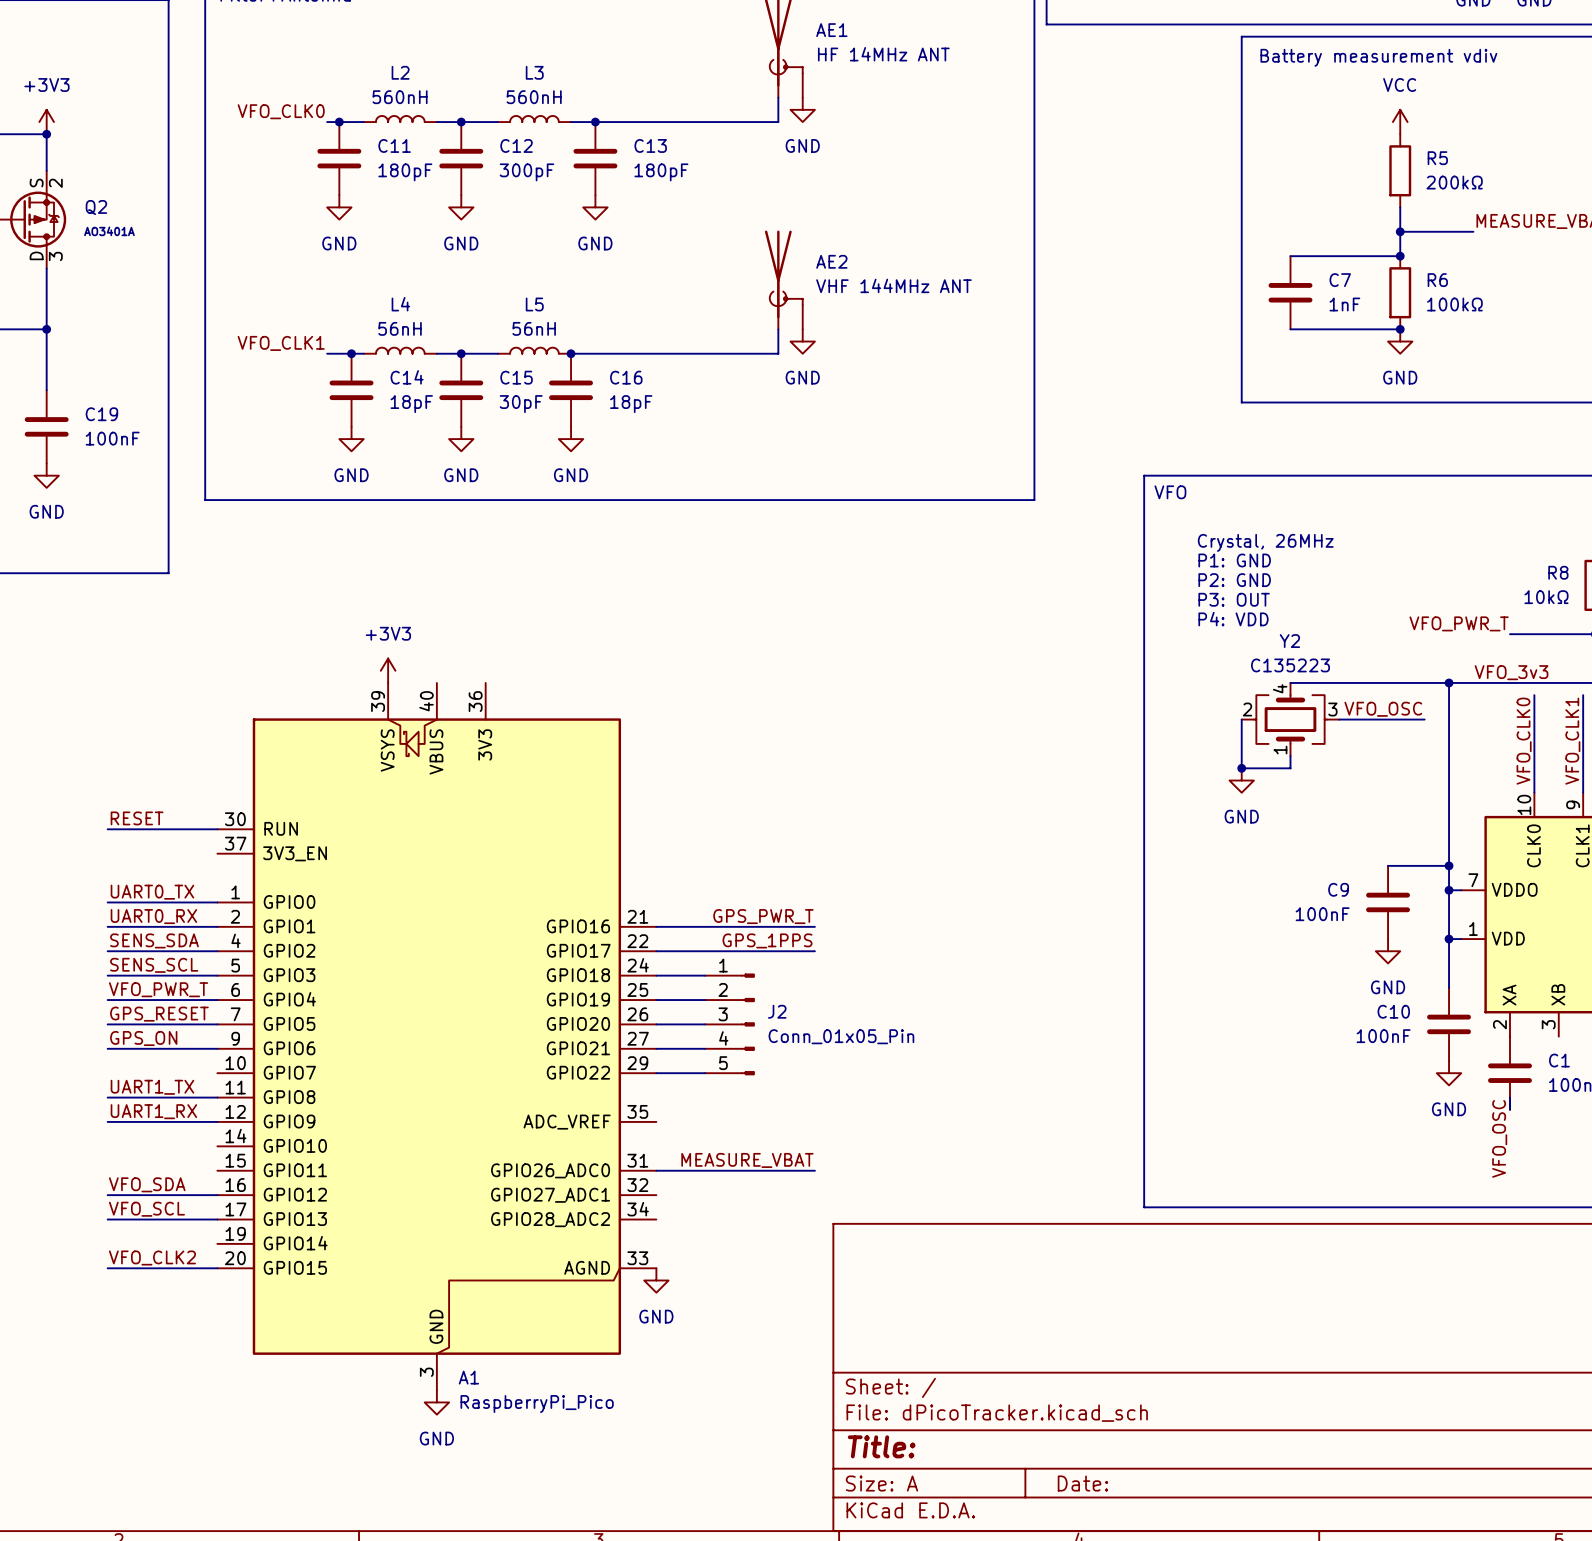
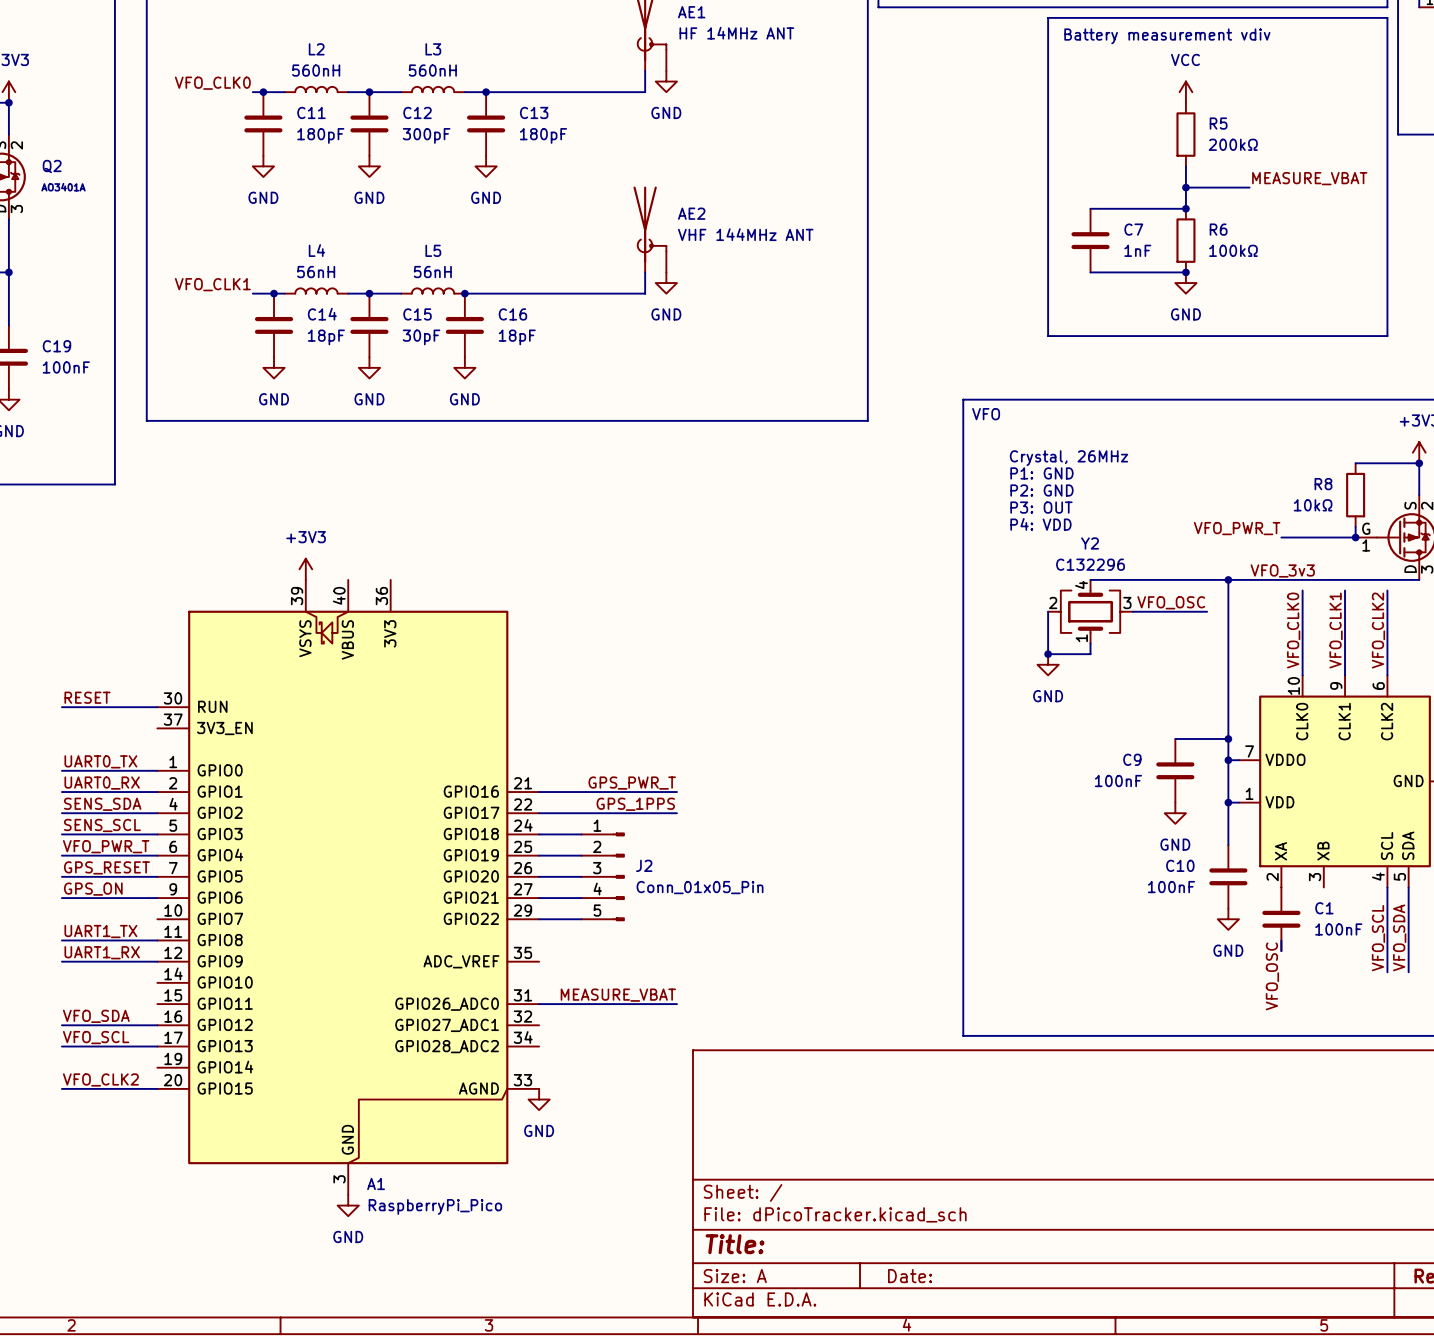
Y2 value: C135223 (1290, 665) -> C132296 (1090, 564)

